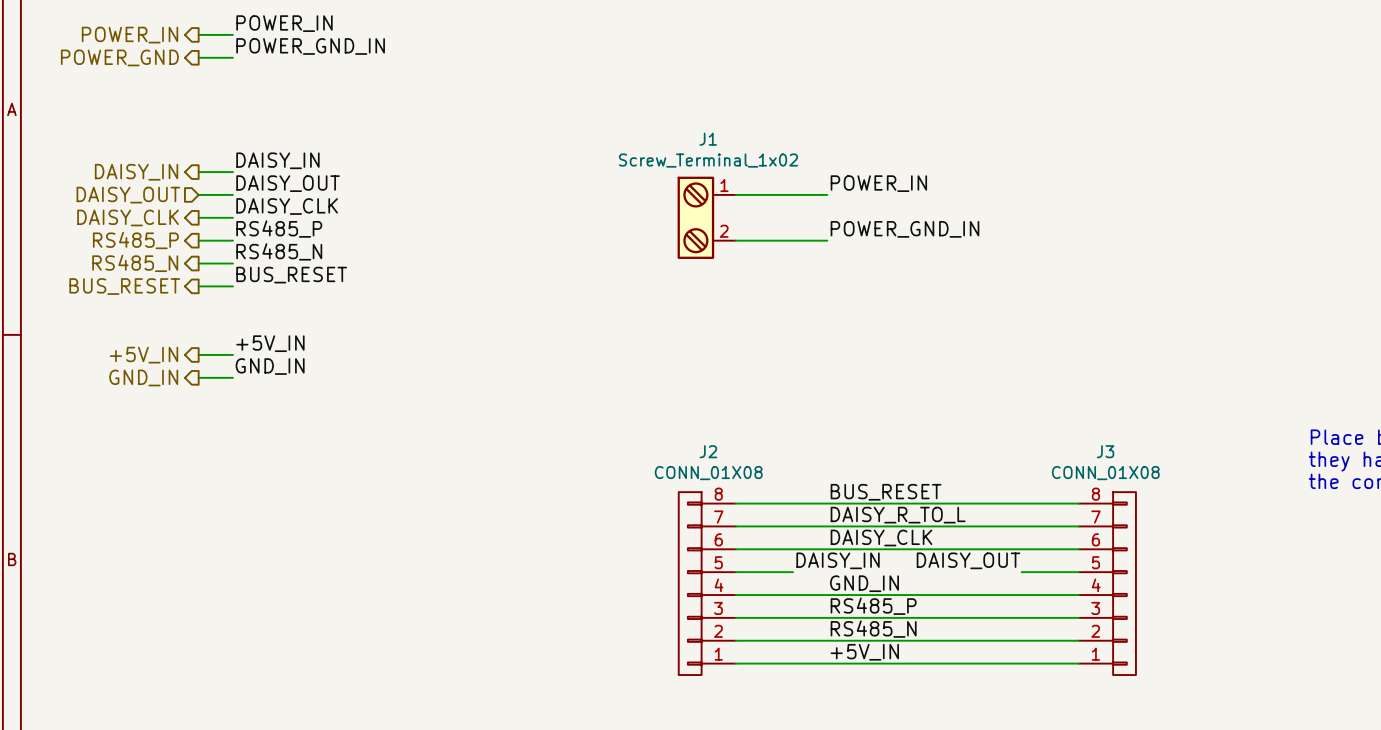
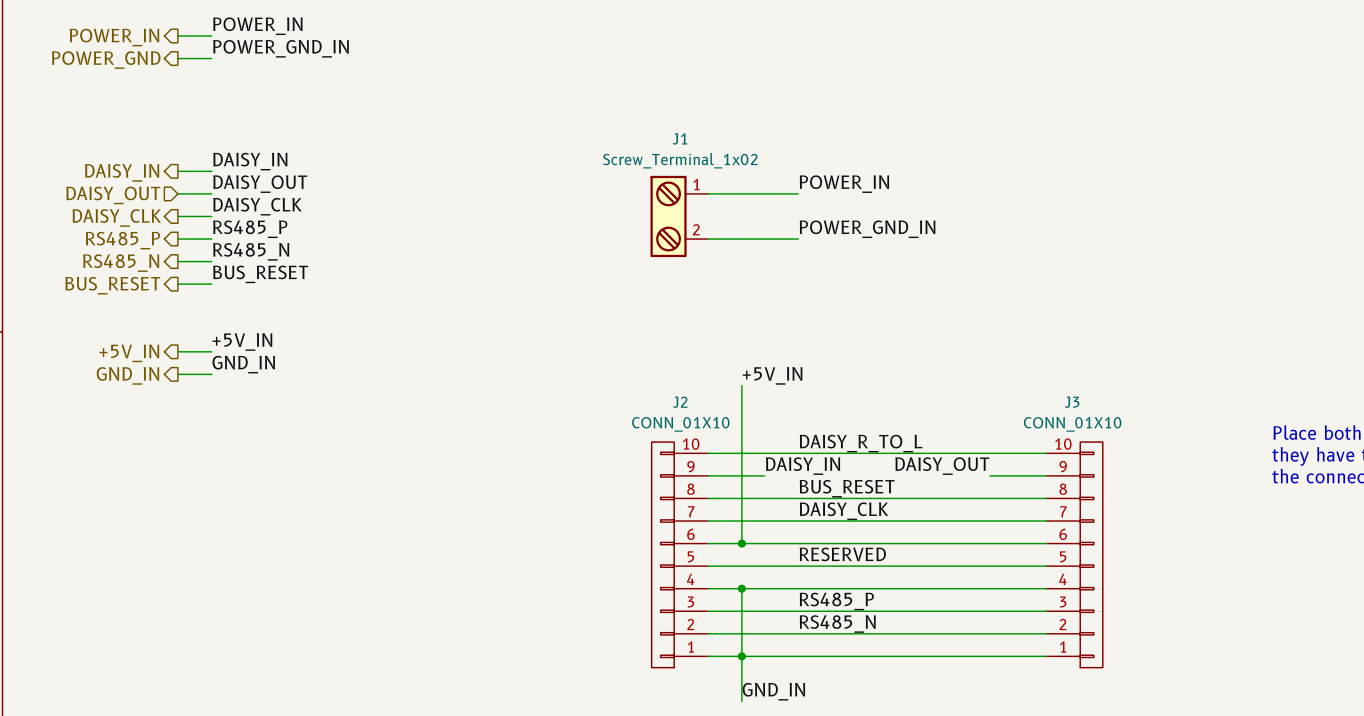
label: none -> +5V_IN (772, 375)
wire: none -> (741, 385) (741, 543)
label: none -> DAISY_R_TO_L (861, 443)
J2 name position: J2 (708, 451) -> J2 (680, 402)
J3 name position: J3 (1105, 451) -> J3 (1072, 402)
wire: none -> (708, 453) (1046, 453)
J2 value: CONN_01X08 (708, 473) -> CONN_01X10 (680, 424)
J3 value: CONN_01X08 (1105, 473) -> CONN_01X10 (1072, 424)
wire: none -> (708, 475) (764, 475)
wire: none -> (990, 475) (1046, 475)
J2 symbol: [678, 492, 736, 676] -> [651, 442, 709, 668]
J3 symbol: [1078, 492, 1136, 676] -> [1046, 442, 1103, 668]
label: DAISY_R_TO_L (898, 515) -> DAISY_CLK (843, 511)
label: DAISY_CLK (881, 537) -> none
junction: none -> (741, 543)
label position: DAISY_IN (838, 560) -> DAISY_IN (803, 466)
label: none -> RESERVED (842, 554)
label position: DAISY_OUT (968, 560) -> DAISY_OUT (942, 466)
wire: none -> (764, 566) (990, 566)
label position: GND_IN (864, 583) -> GND_IN (773, 691)
wire: none -> (741, 588) (741, 701)
junction: none -> (741, 588)
label: +5V_IN (864, 652) -> none
junction: none -> (741, 656)

